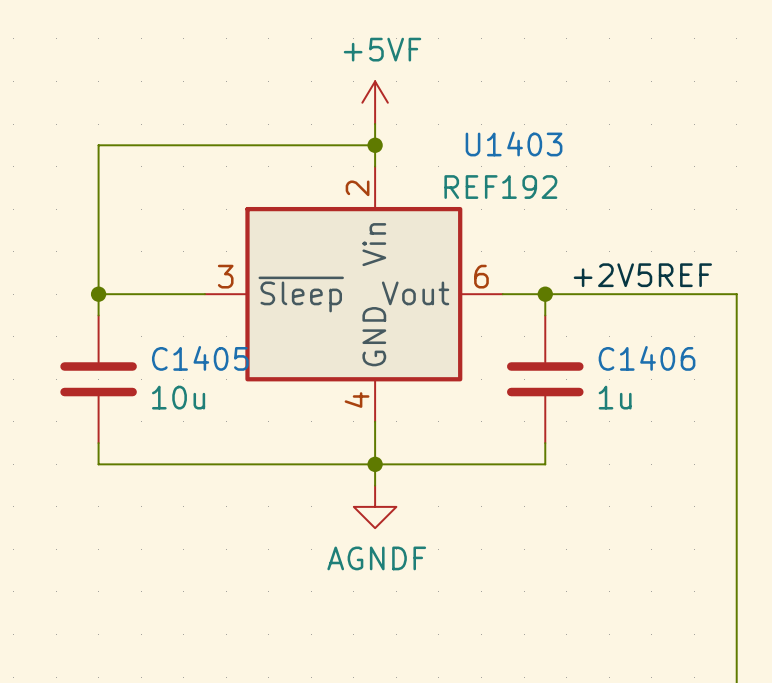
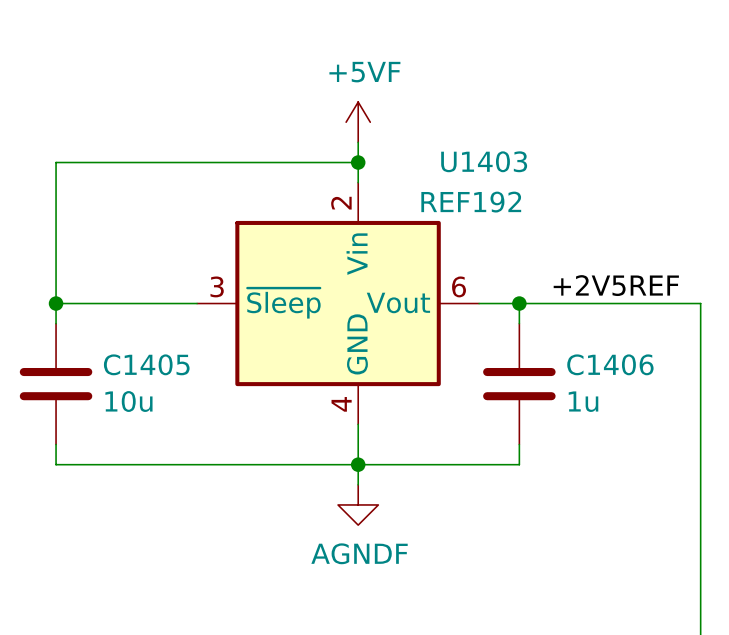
wire: (98, 145) (98, 315) -> (96, 162) (56, 162) (56, 323)
wire: none -> (56, 303) (96, 303)
junction position: (98, 294) -> (56, 303)
C1405 position: (98, 379) -> (56, 384)
wire: (98, 443) (98, 464) -> (56, 444) (56, 464) (96, 464)

